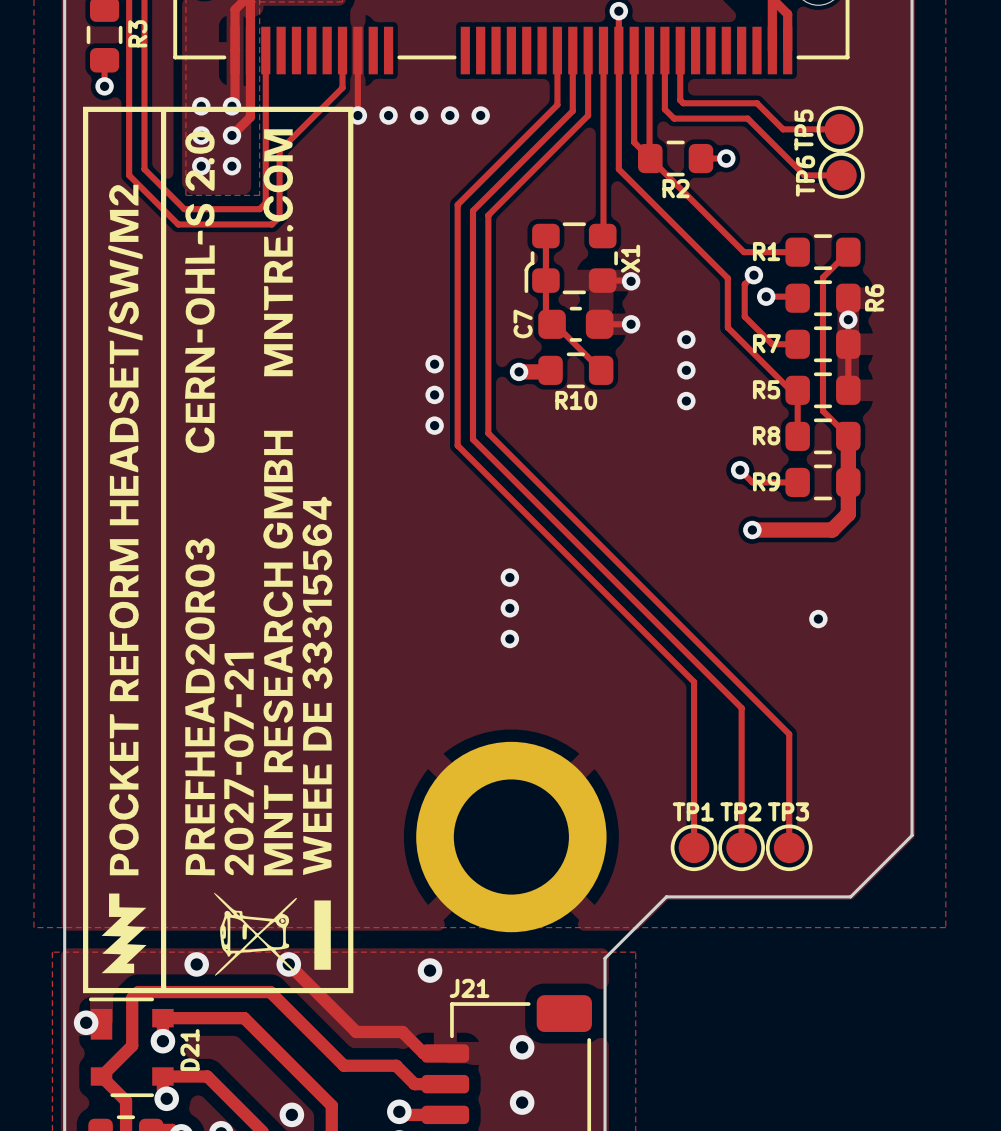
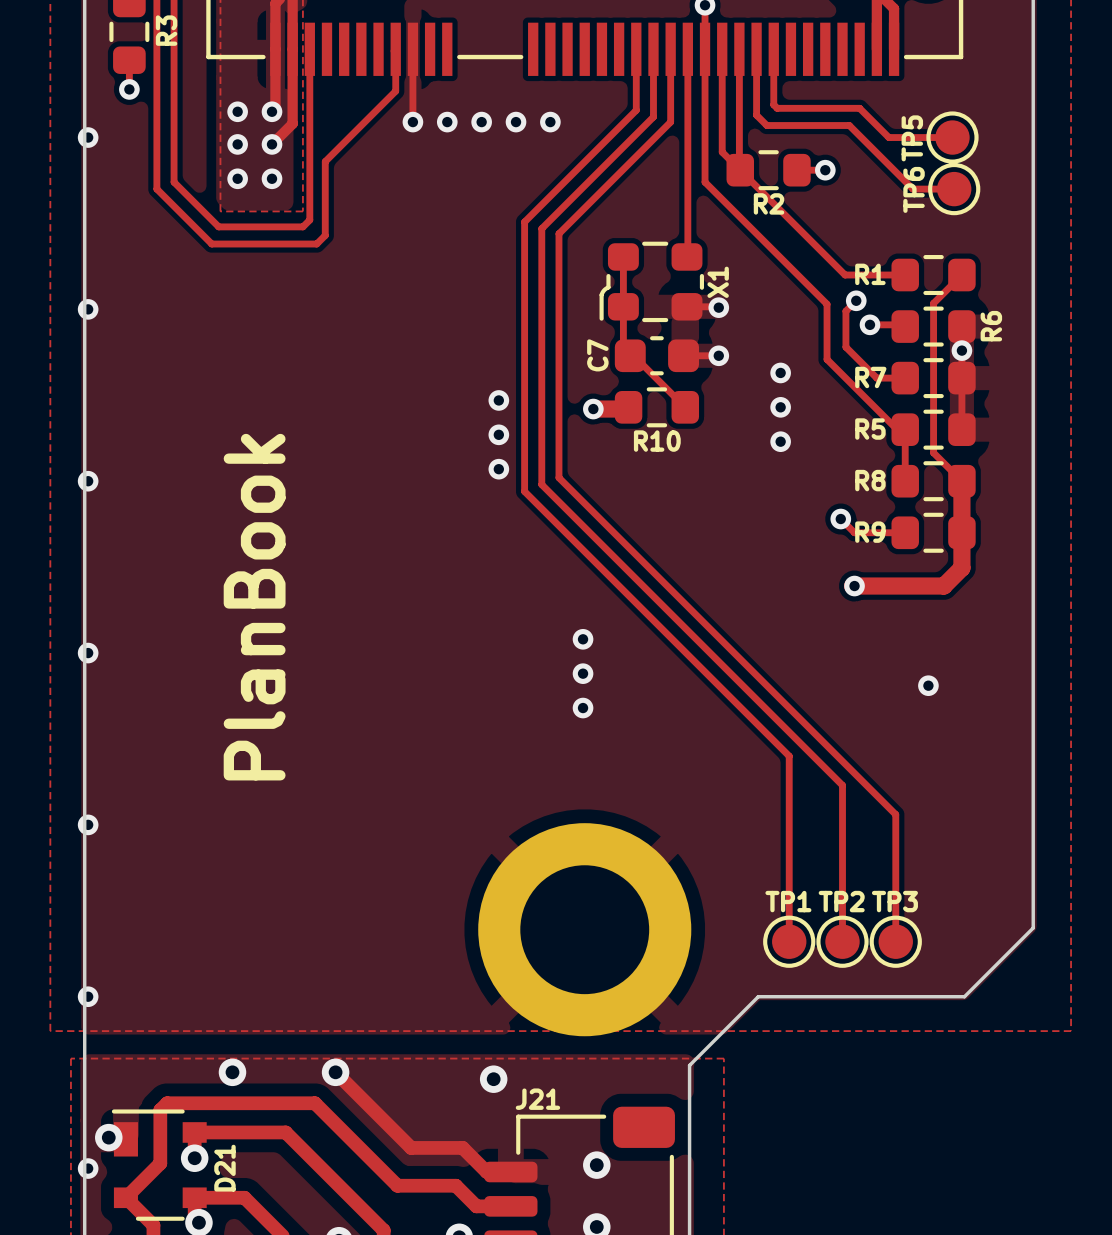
drawing: [83, 106, 354, 994] -> none
via: none -> (88, 137)
via: none -> (88, 309)
via: none -> (88, 481)
text: none -> PlanBook (254, 607)
via: none -> (88, 653)
via: none -> (88, 824)
via: none -> (88, 996)
via: none -> (88, 1168)

